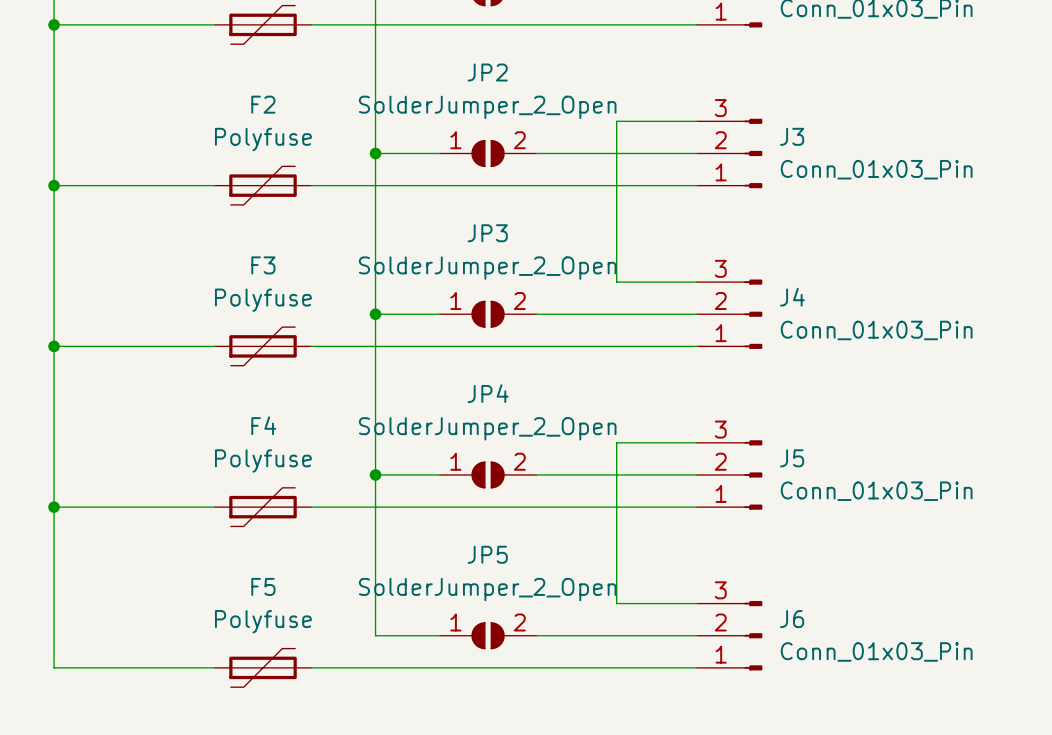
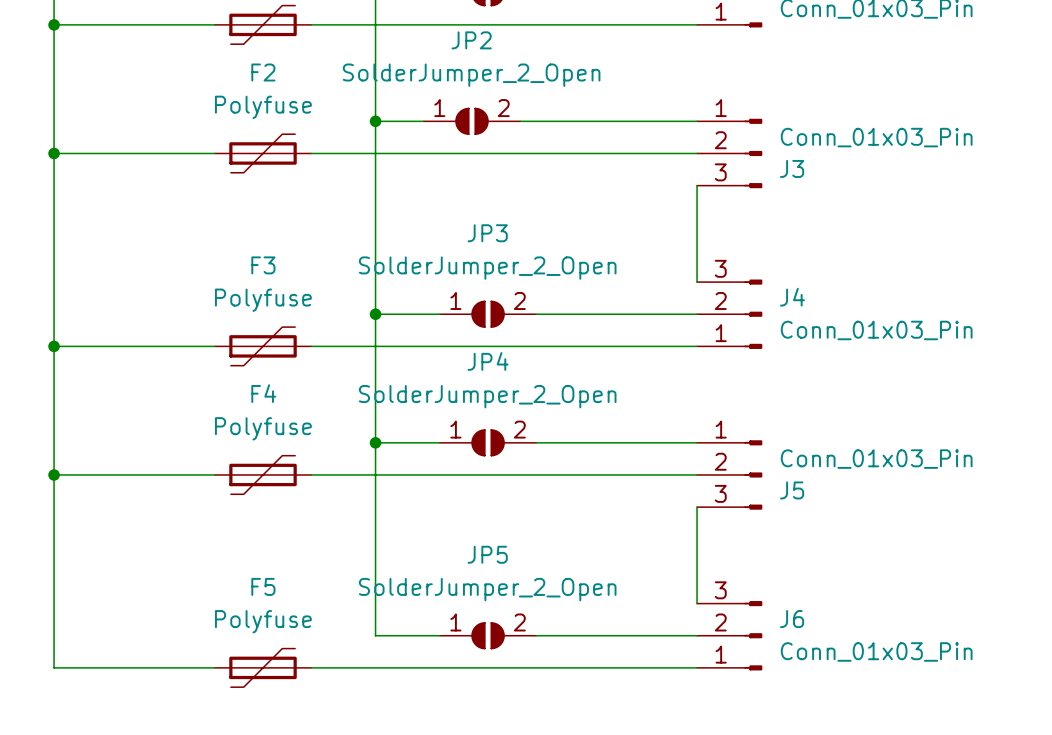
wire: none -> (375, 121) (423, 121)
wire: none -> (520, 121) (616, 121)
wire: (616, 121) (616, 282) (697, 282) -> (697, 185) (697, 282)
wire: none -> (311, 153) (375, 153)
junction position: (375, 153) -> (375, 121)
JP2 position: (488, 153) -> (471, 121)
J3 flip: as is (753, 153) -> up-down (753, 153)
wire: (54, 185) (214, 185) -> (54, 153) (214, 153)
junction position: (54, 185) -> (54, 153)
F2 position: (263, 185) -> (263, 153)
wire: (311, 185) (697, 185) -> none
wire: none -> (375, 442) (439, 442)
wire: none -> (536, 442) (616, 442)
wire: (616, 442) (616, 603) (697, 603) -> (697, 507) (697, 603)
wire: none -> (311, 474) (375, 474)
junction position: (375, 474) -> (375, 442)
JP4 position: (488, 474) -> (488, 442)
J5 flip: as is (753, 474) -> up-down (753, 474)
wire: (54, 507) (214, 507) -> (54, 474) (214, 474)
junction position: (54, 507) -> (54, 474)
F4 position: (263, 507) -> (263, 474)
wire: (311, 507) (697, 507) -> none

